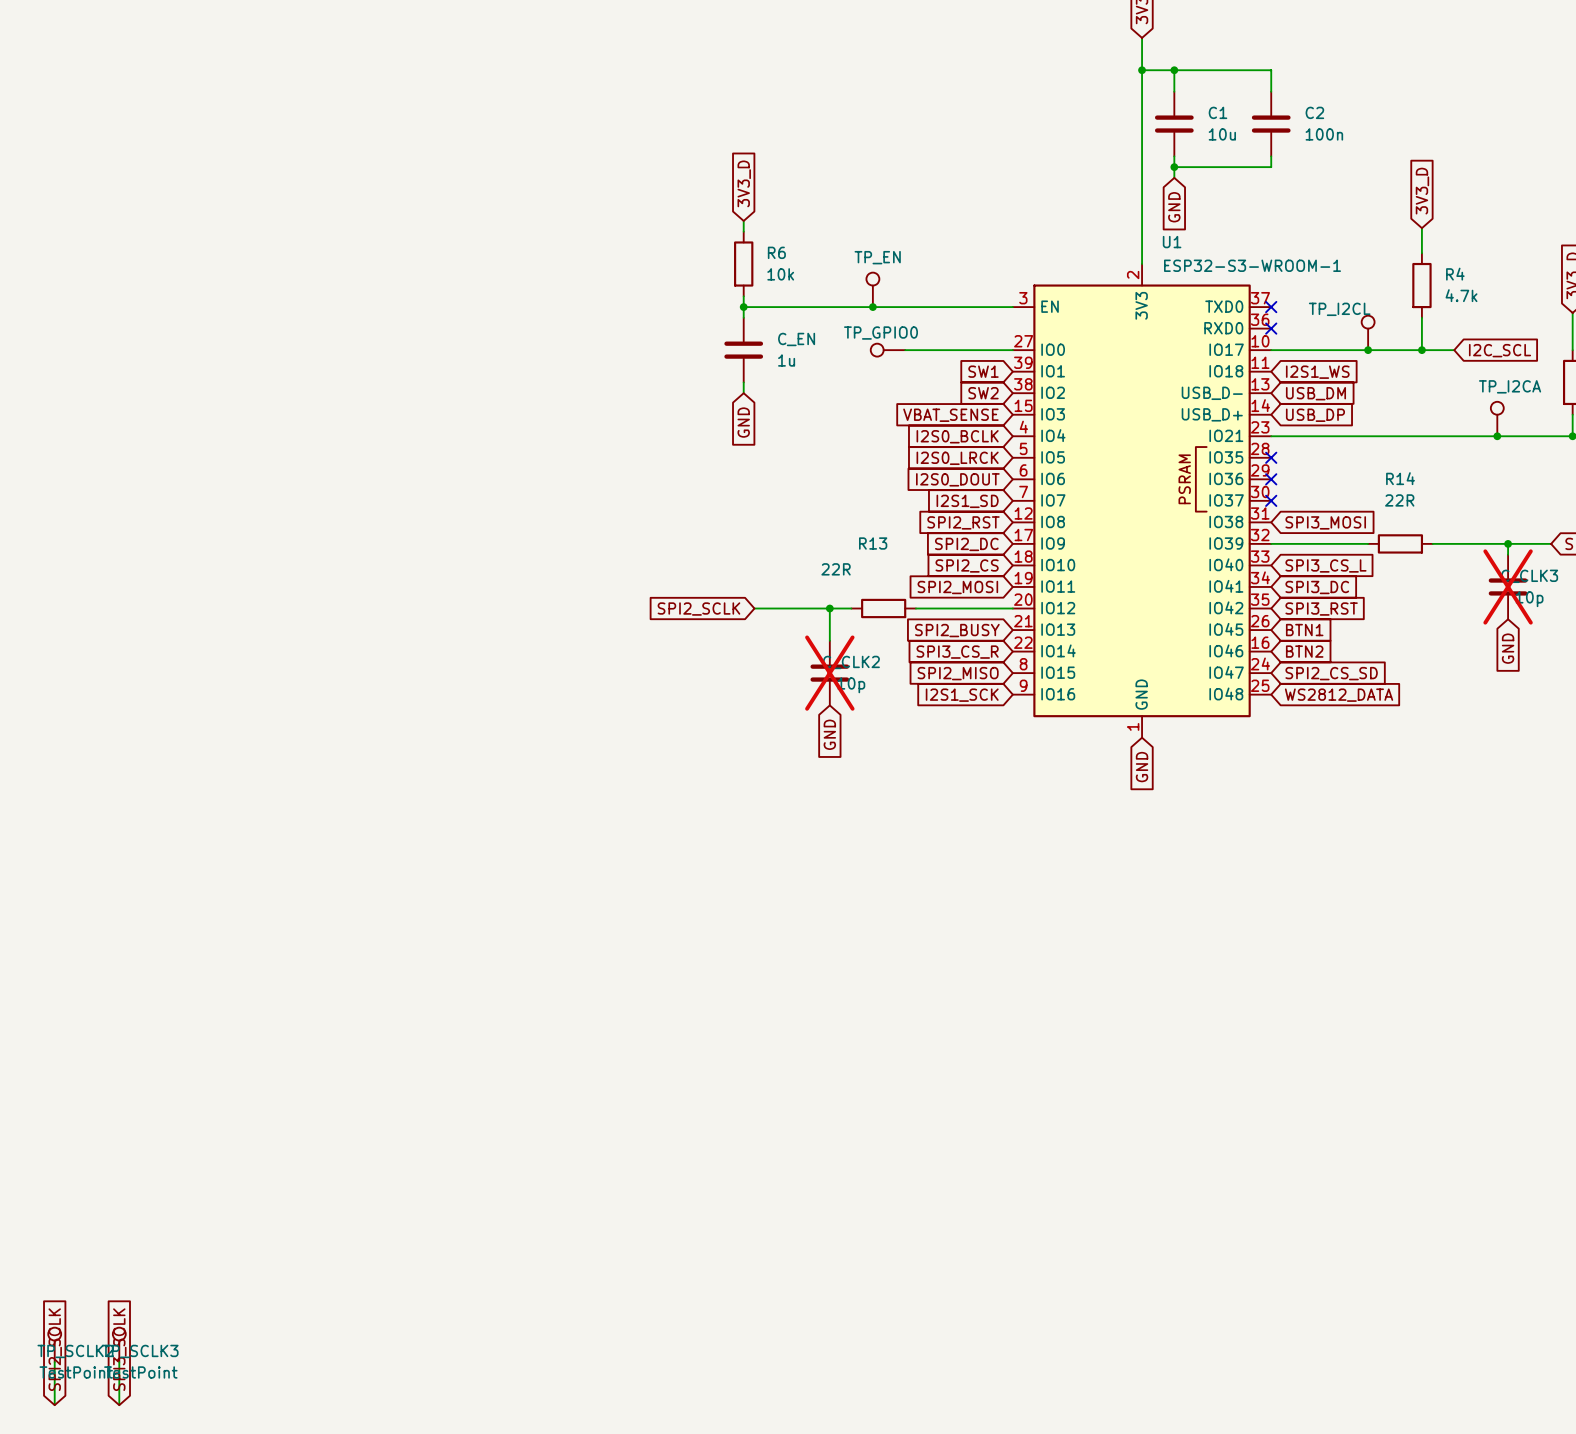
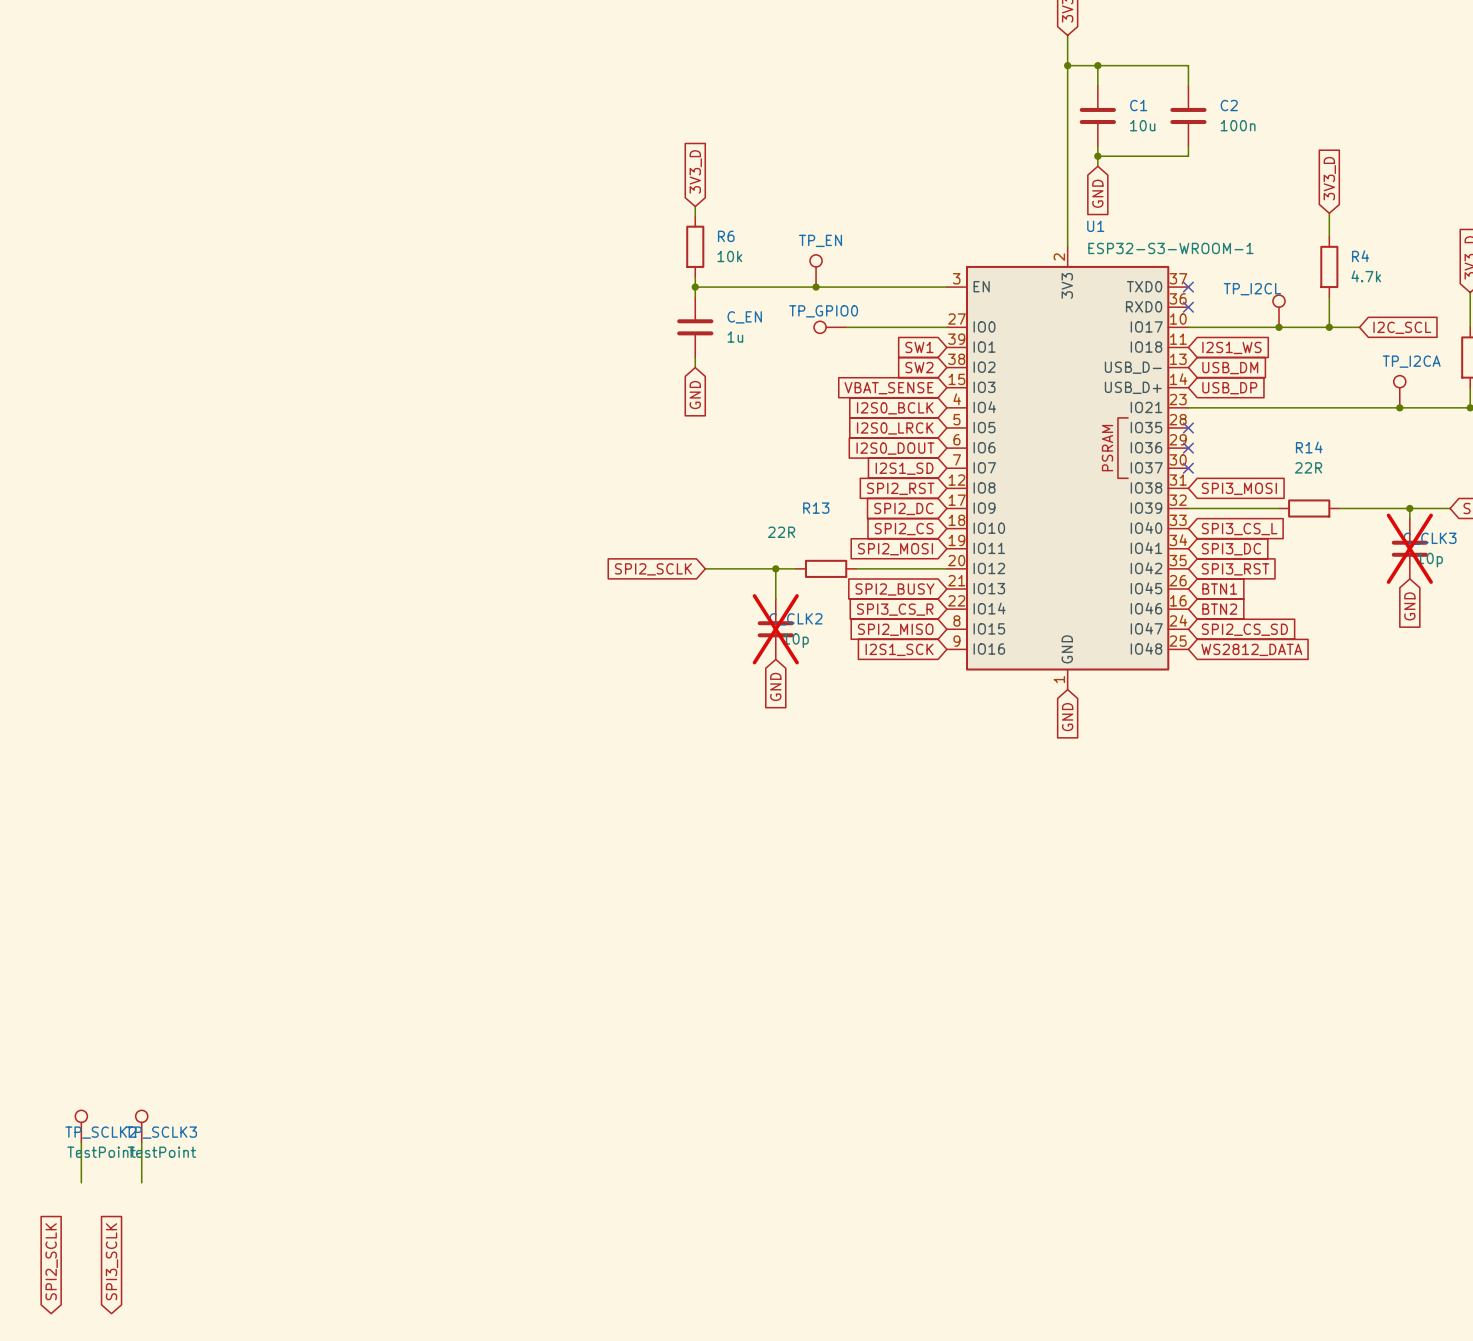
TP_SCLK2 position: (54, 1344) -> (81, 1126)
TP_SCLK3 position: (119, 1344) -> (141, 1126)
wire: (54, 1362) (54, 1405) -> (81, 1142) (81, 1182)
wire: (119, 1362) (119, 1405) -> (141, 1142) (141, 1182)

